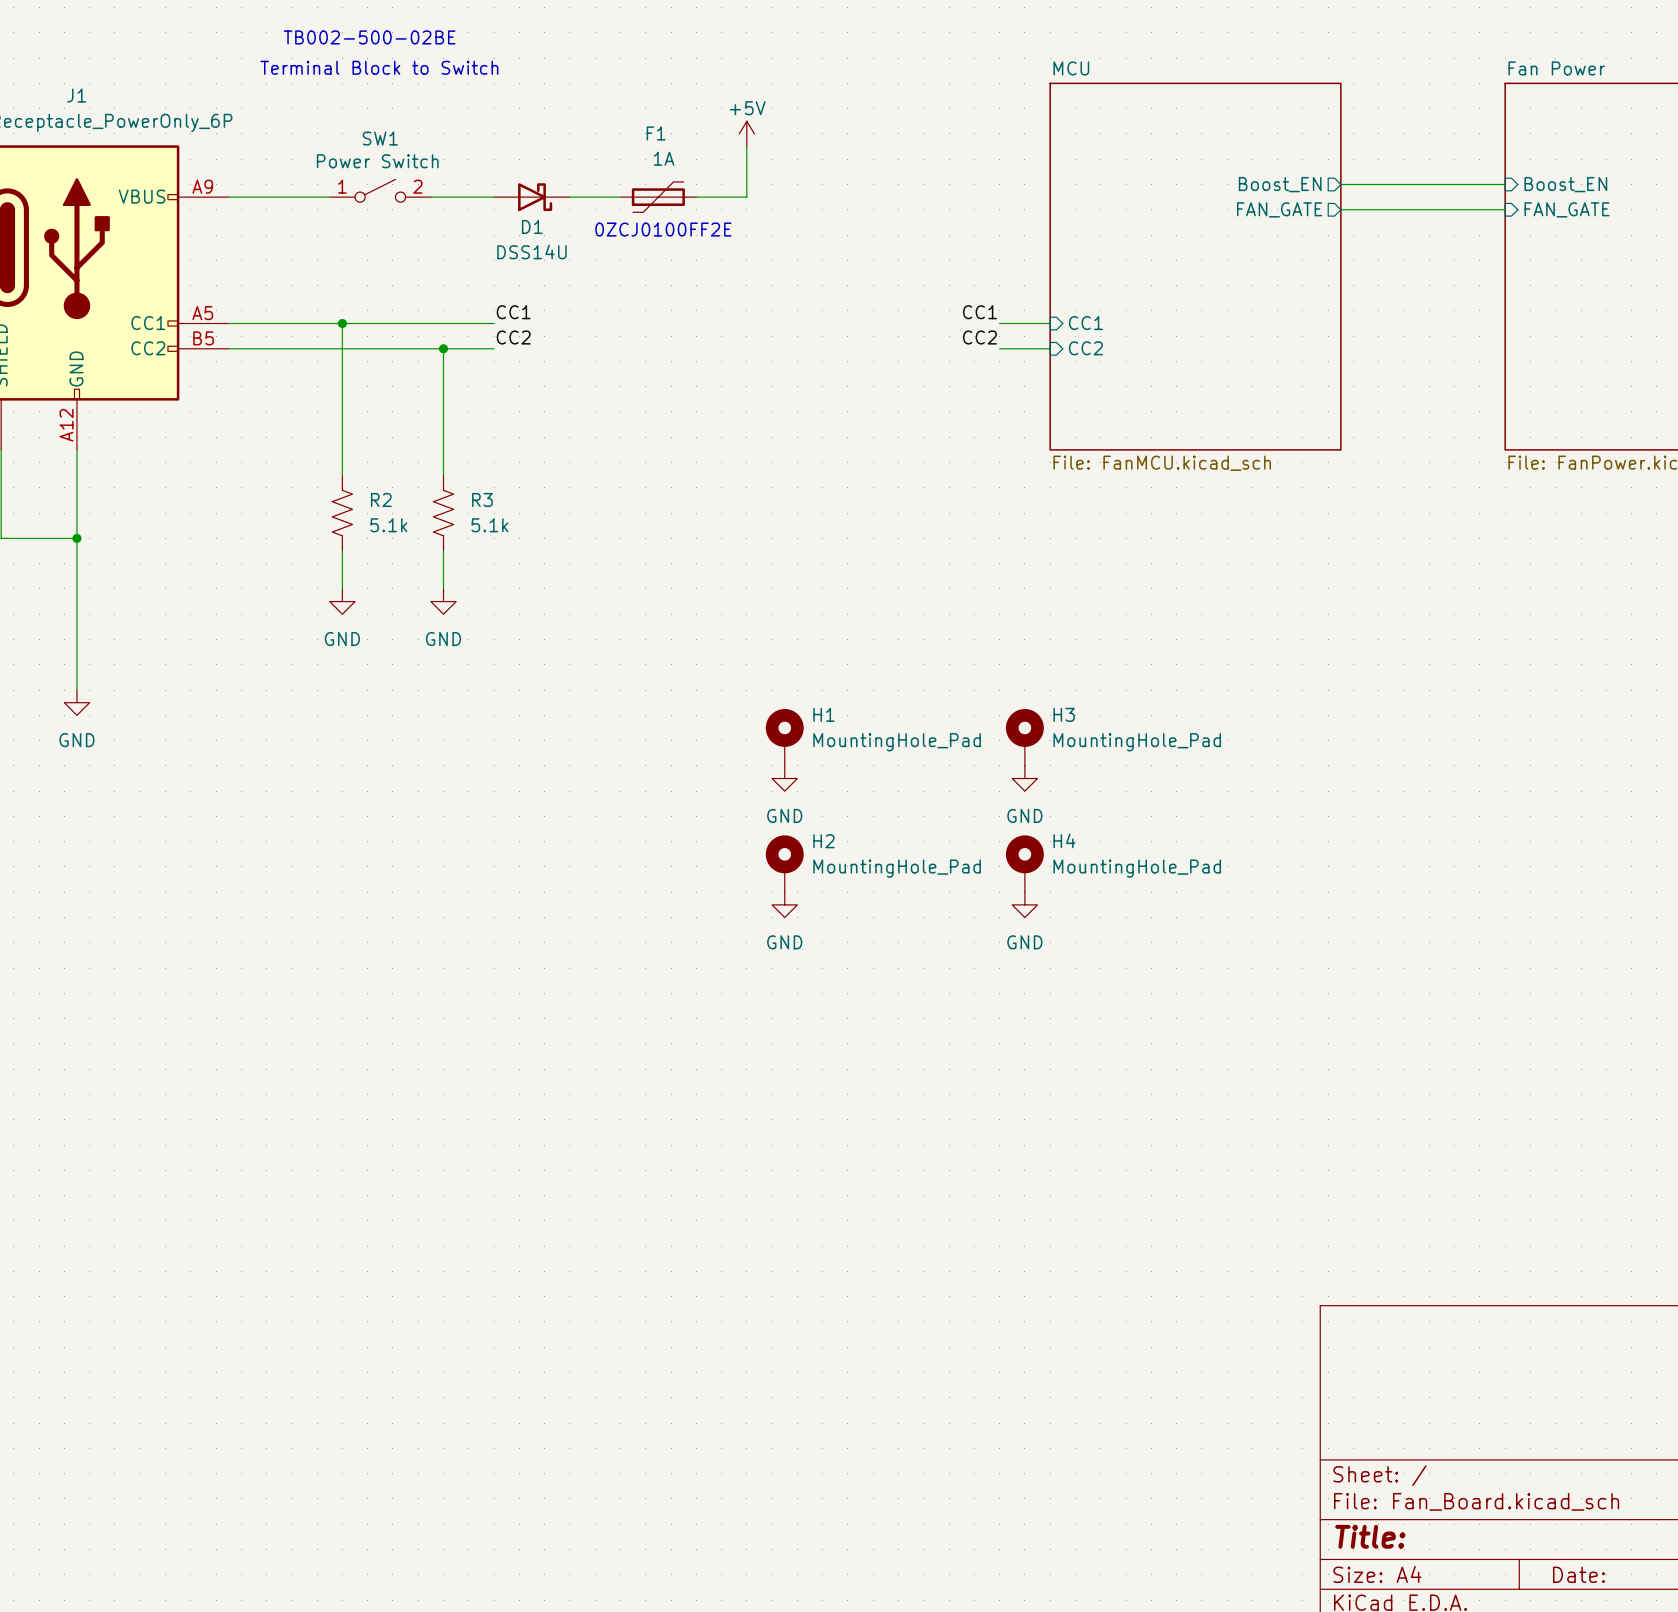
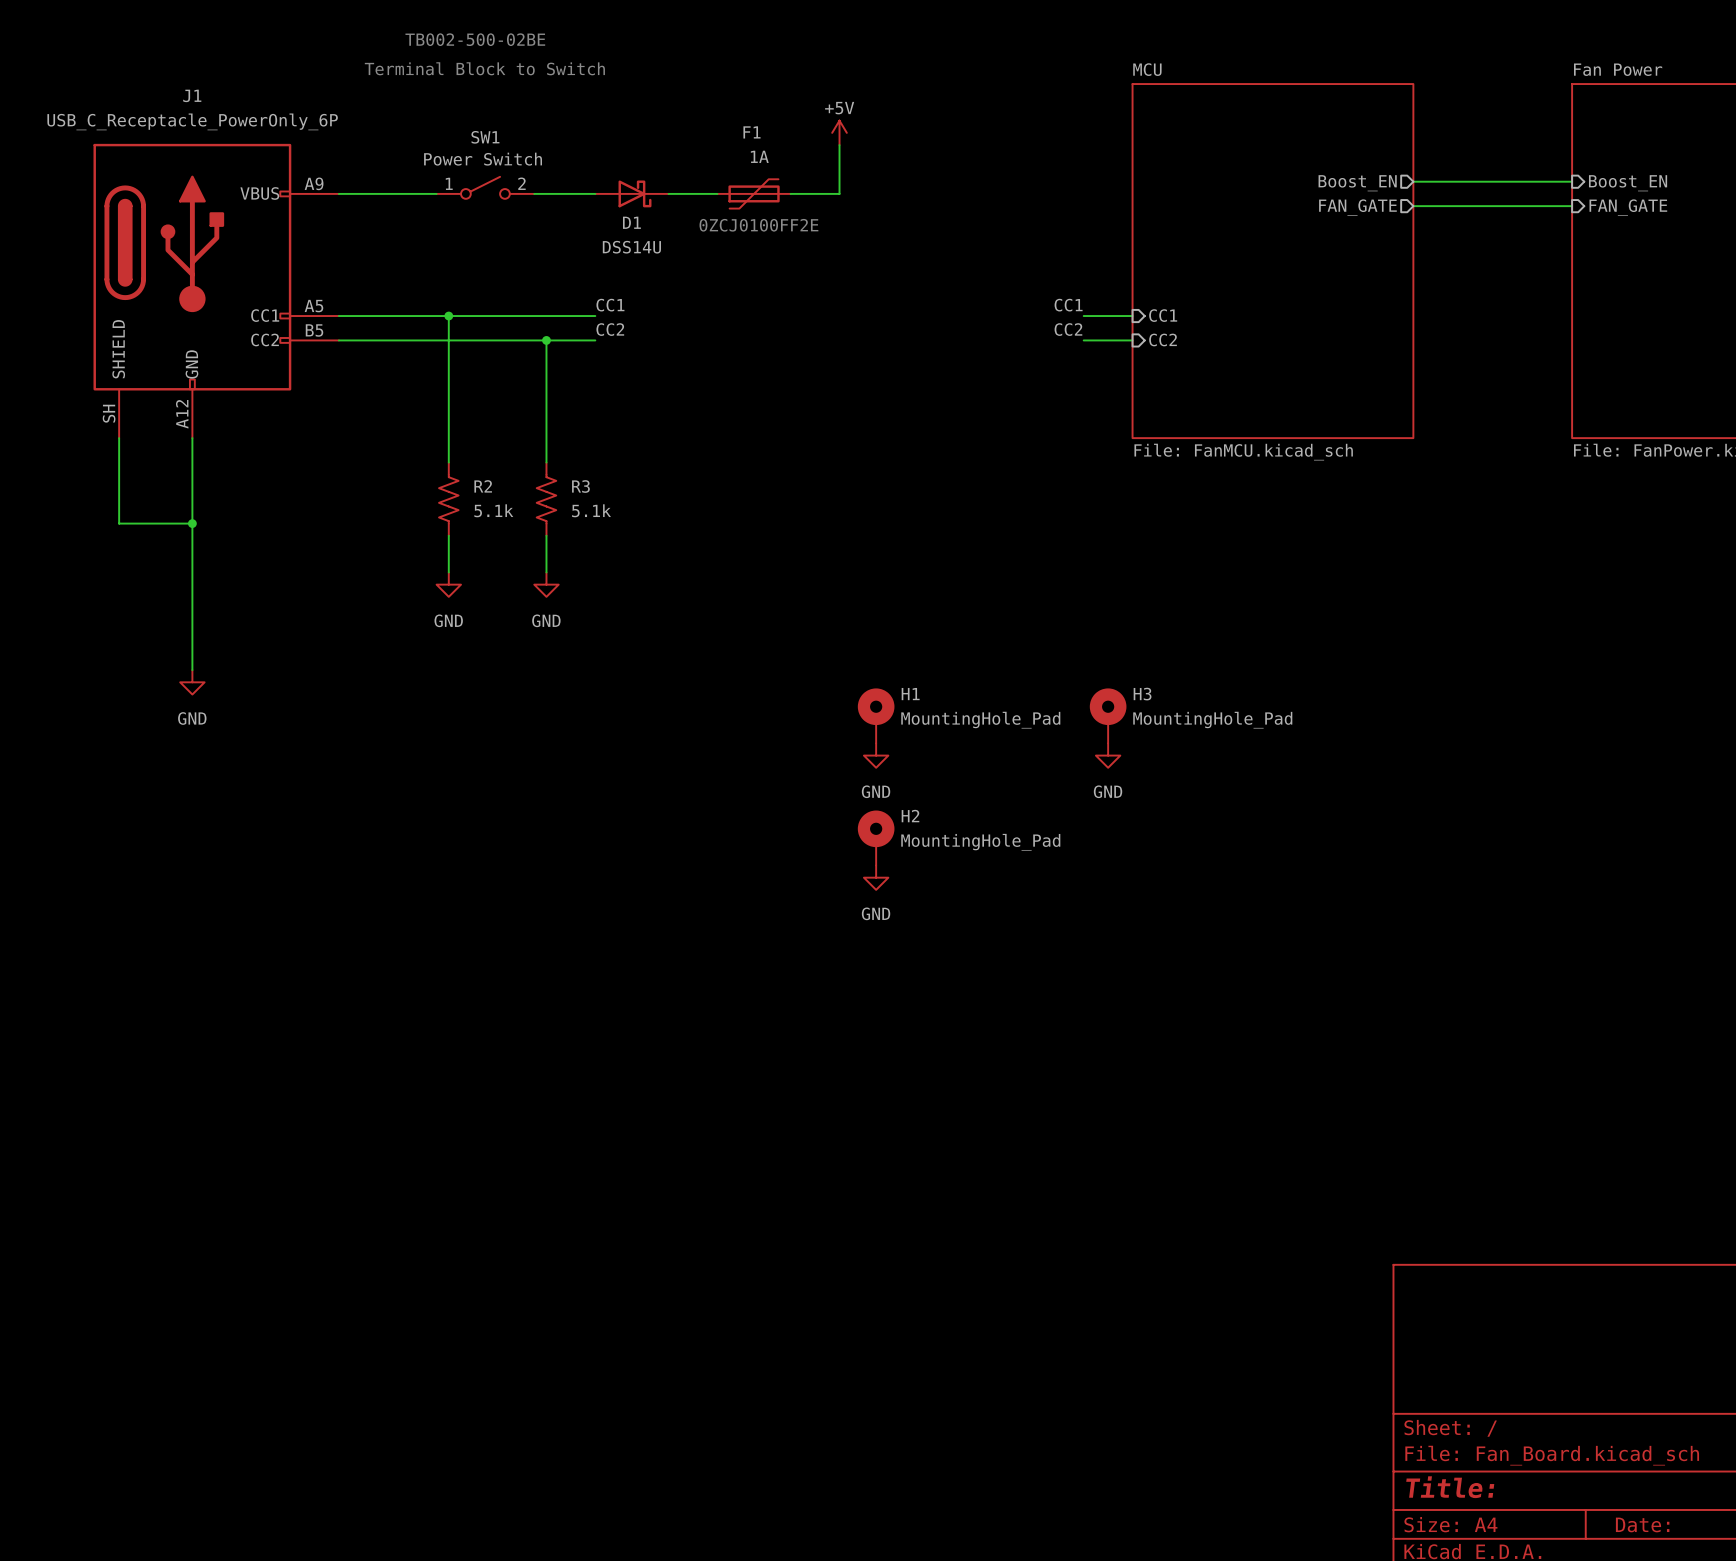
H4: MountingHole_Pad (1024, 863) -> none
power symbol: GND (1024, 904) -> none

